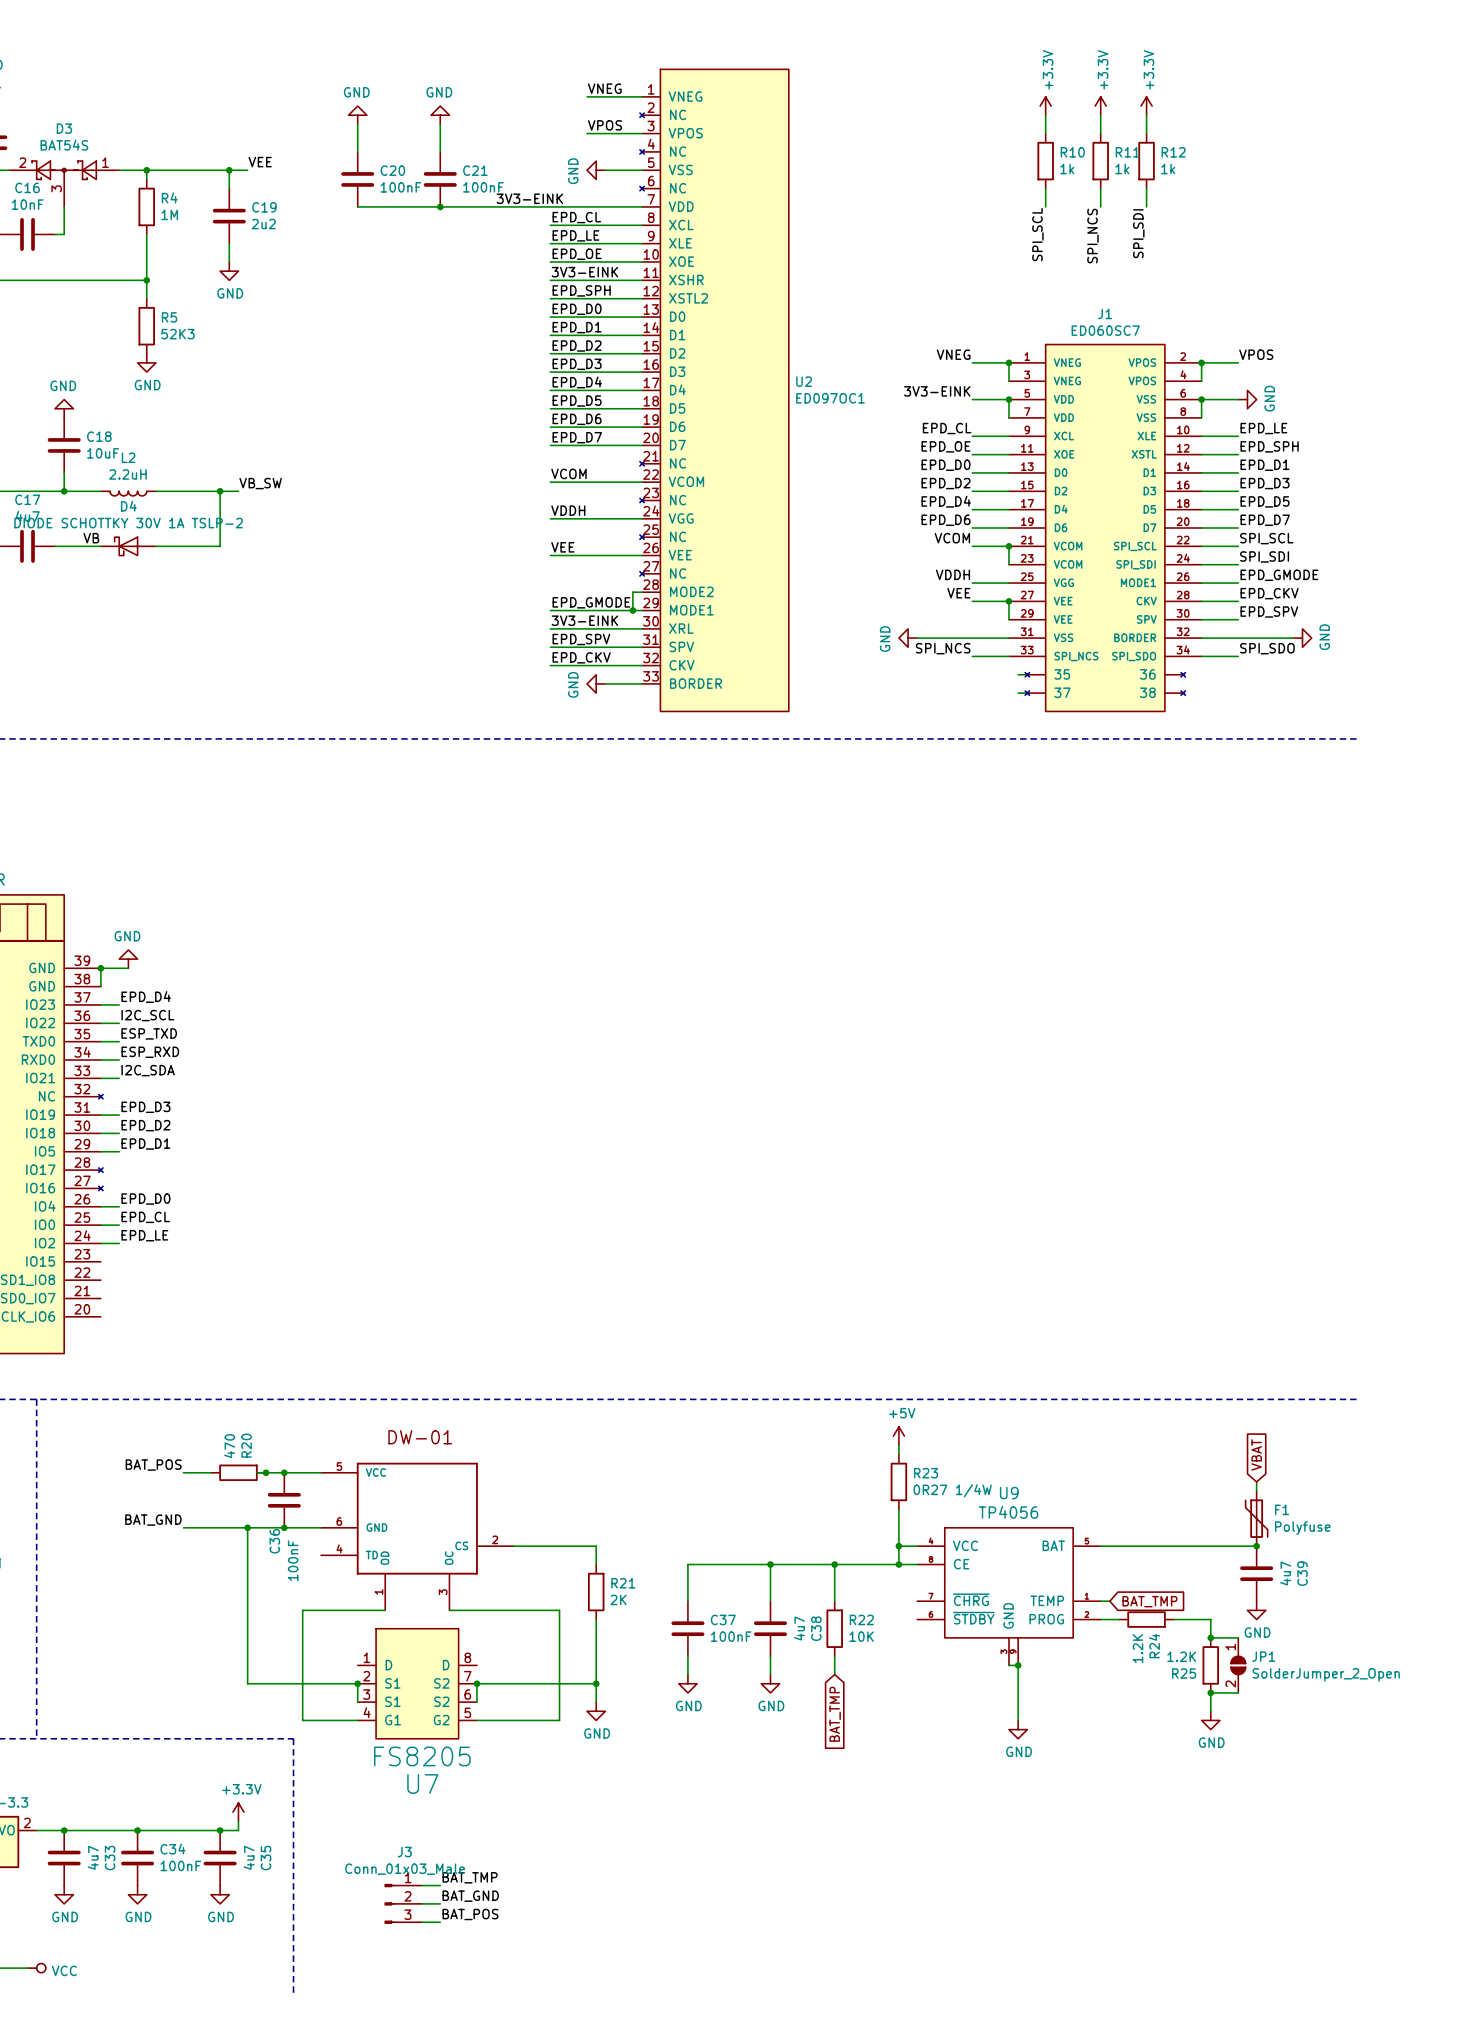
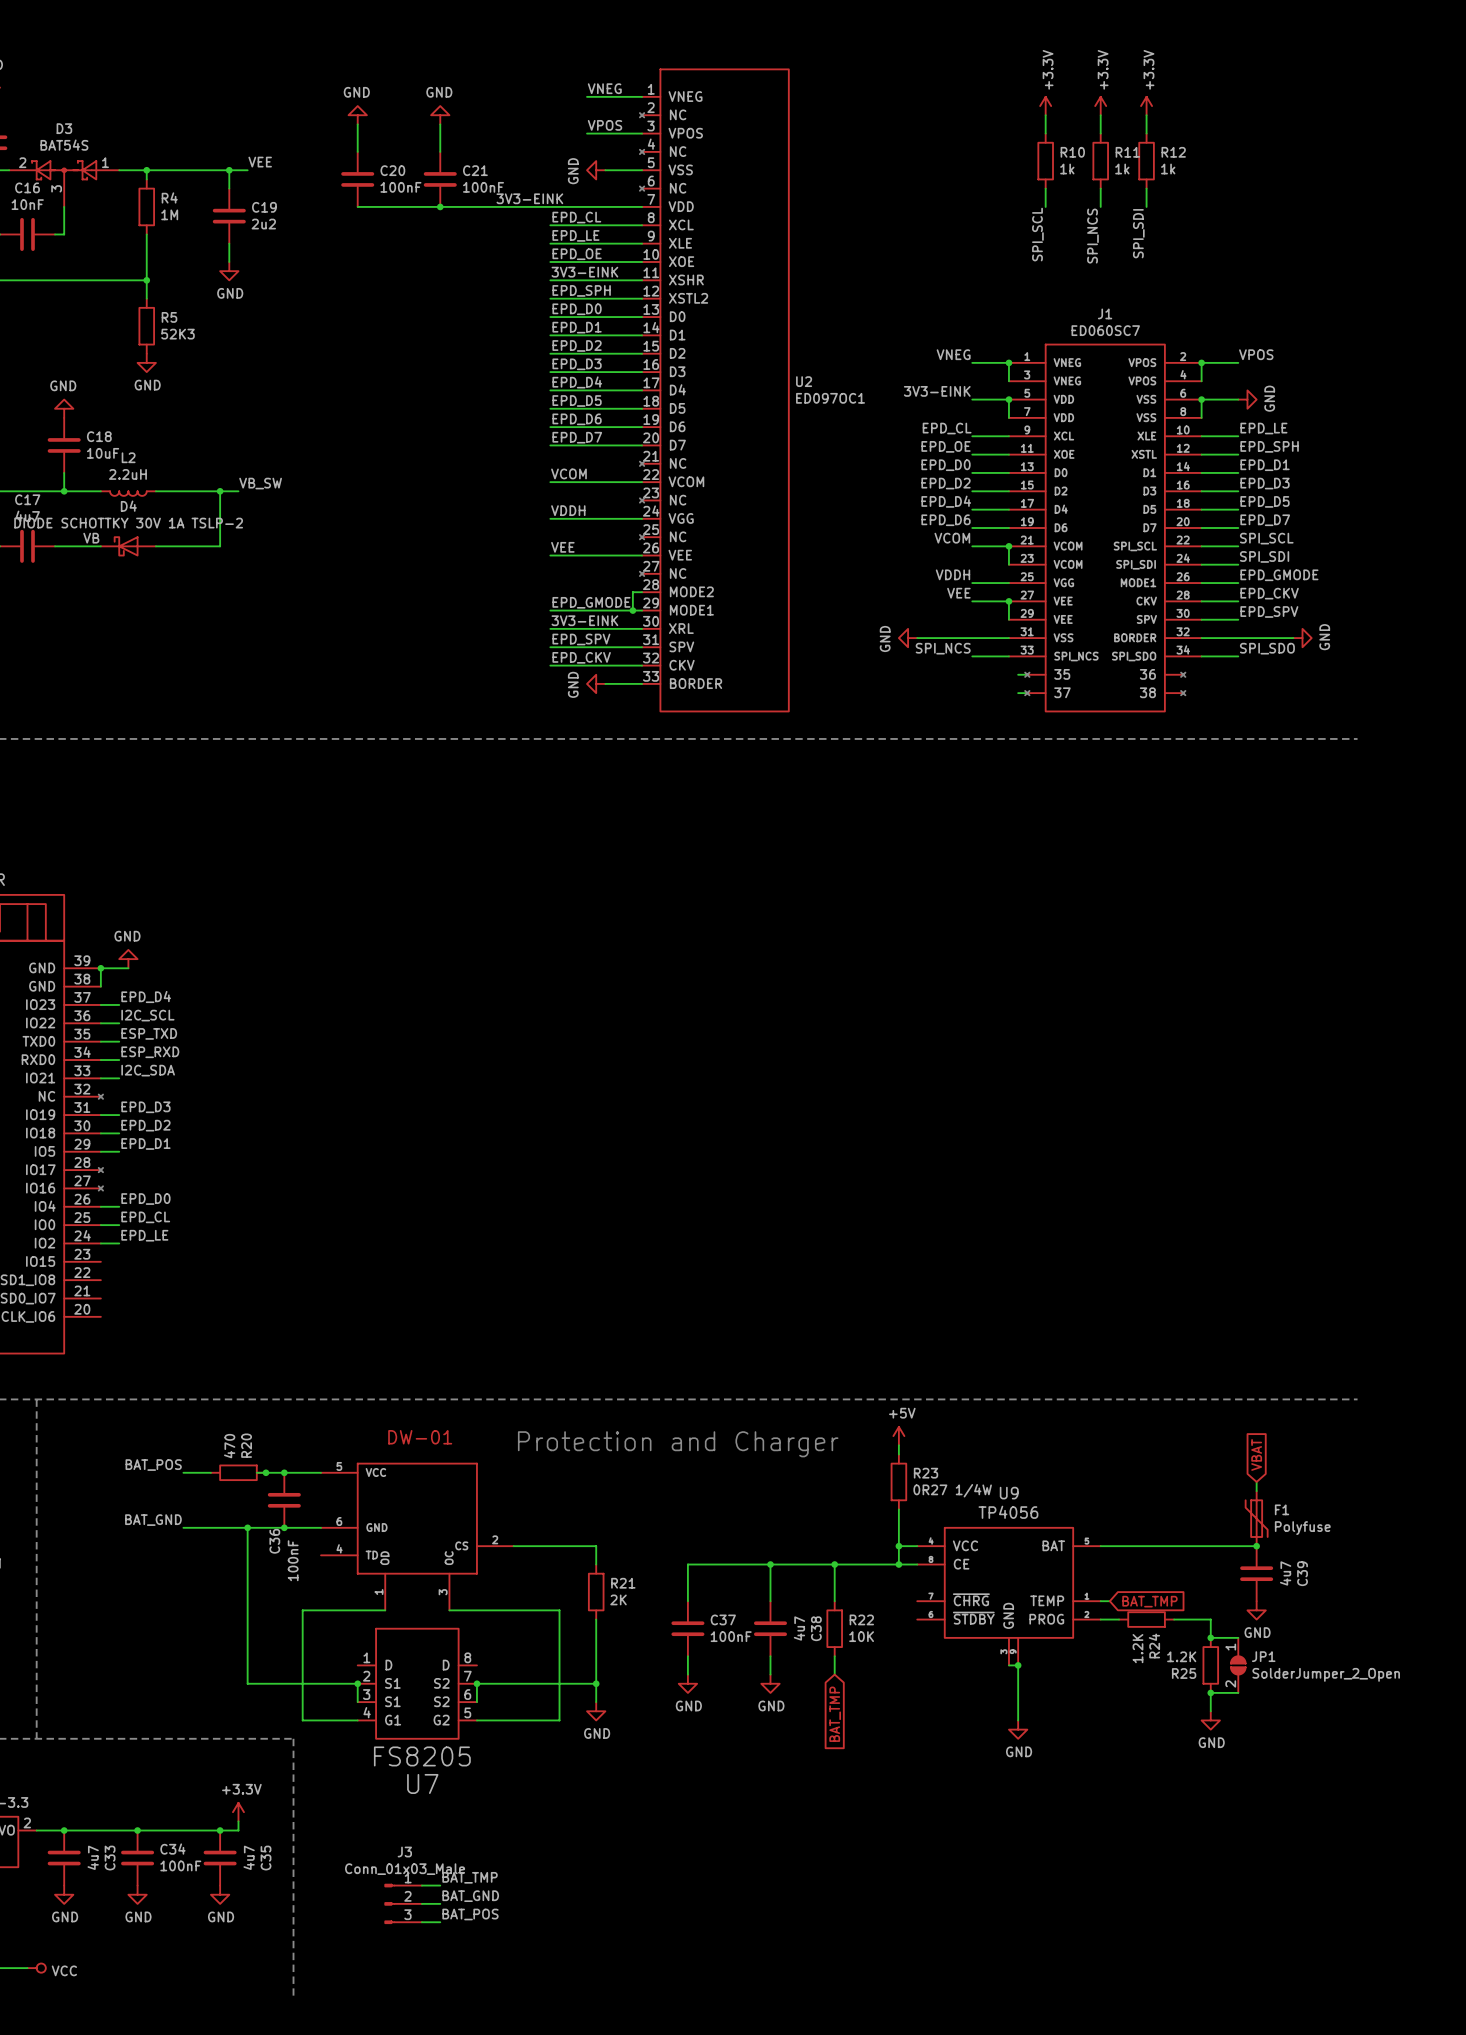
text: none -> Protection and Charger (678, 1444)

